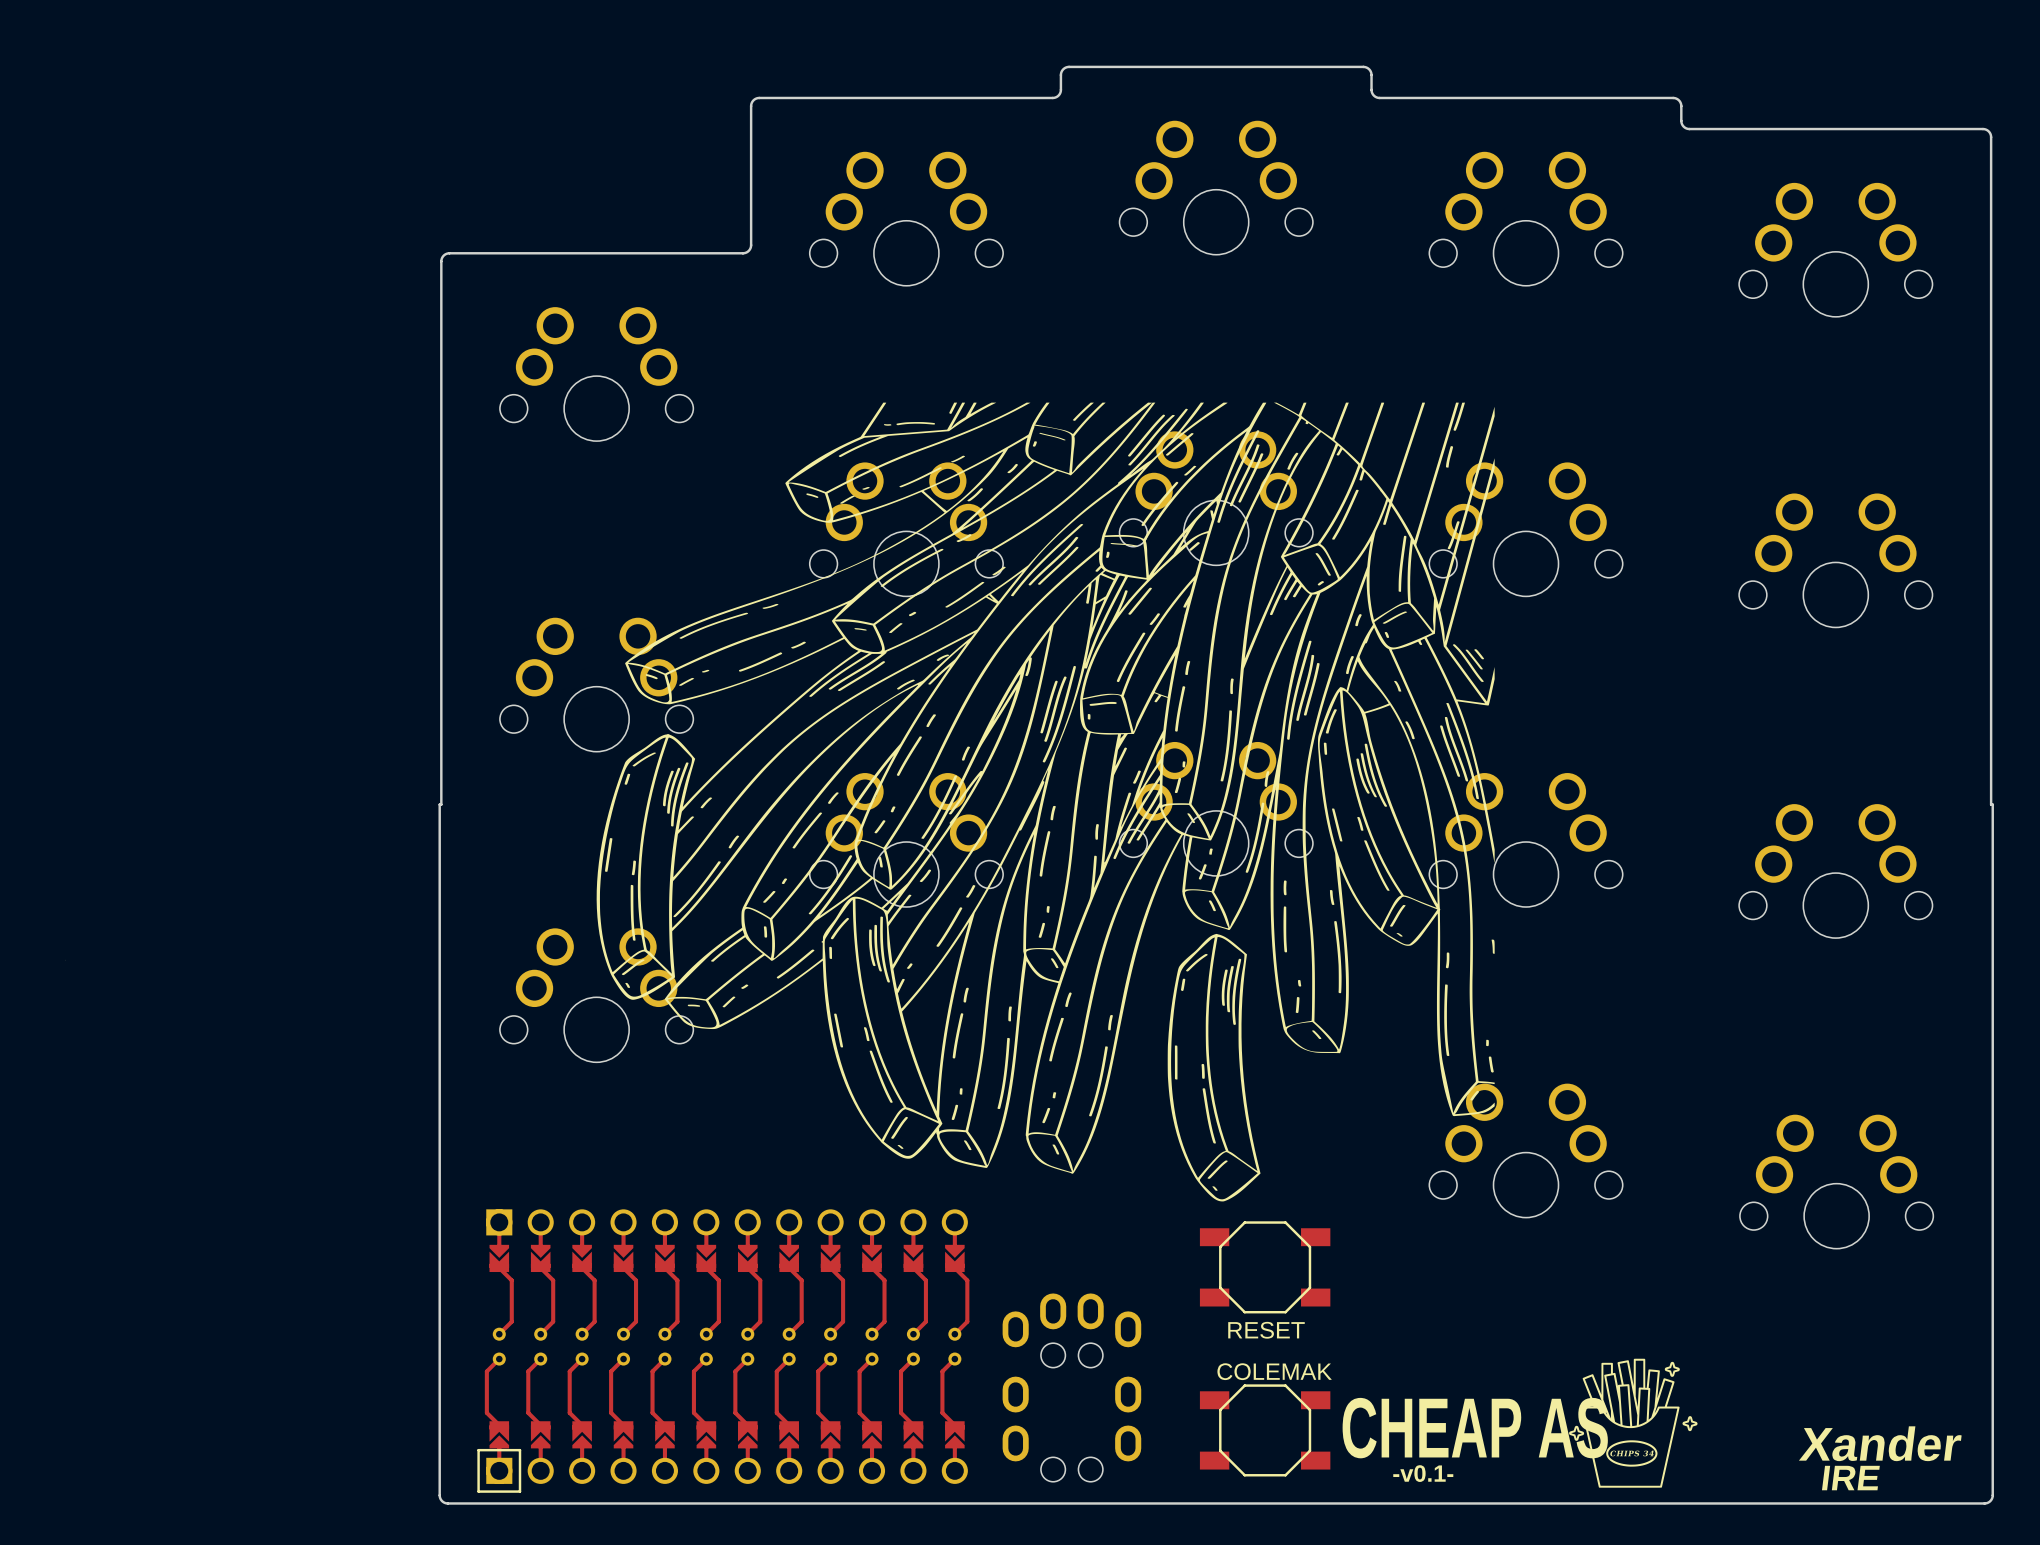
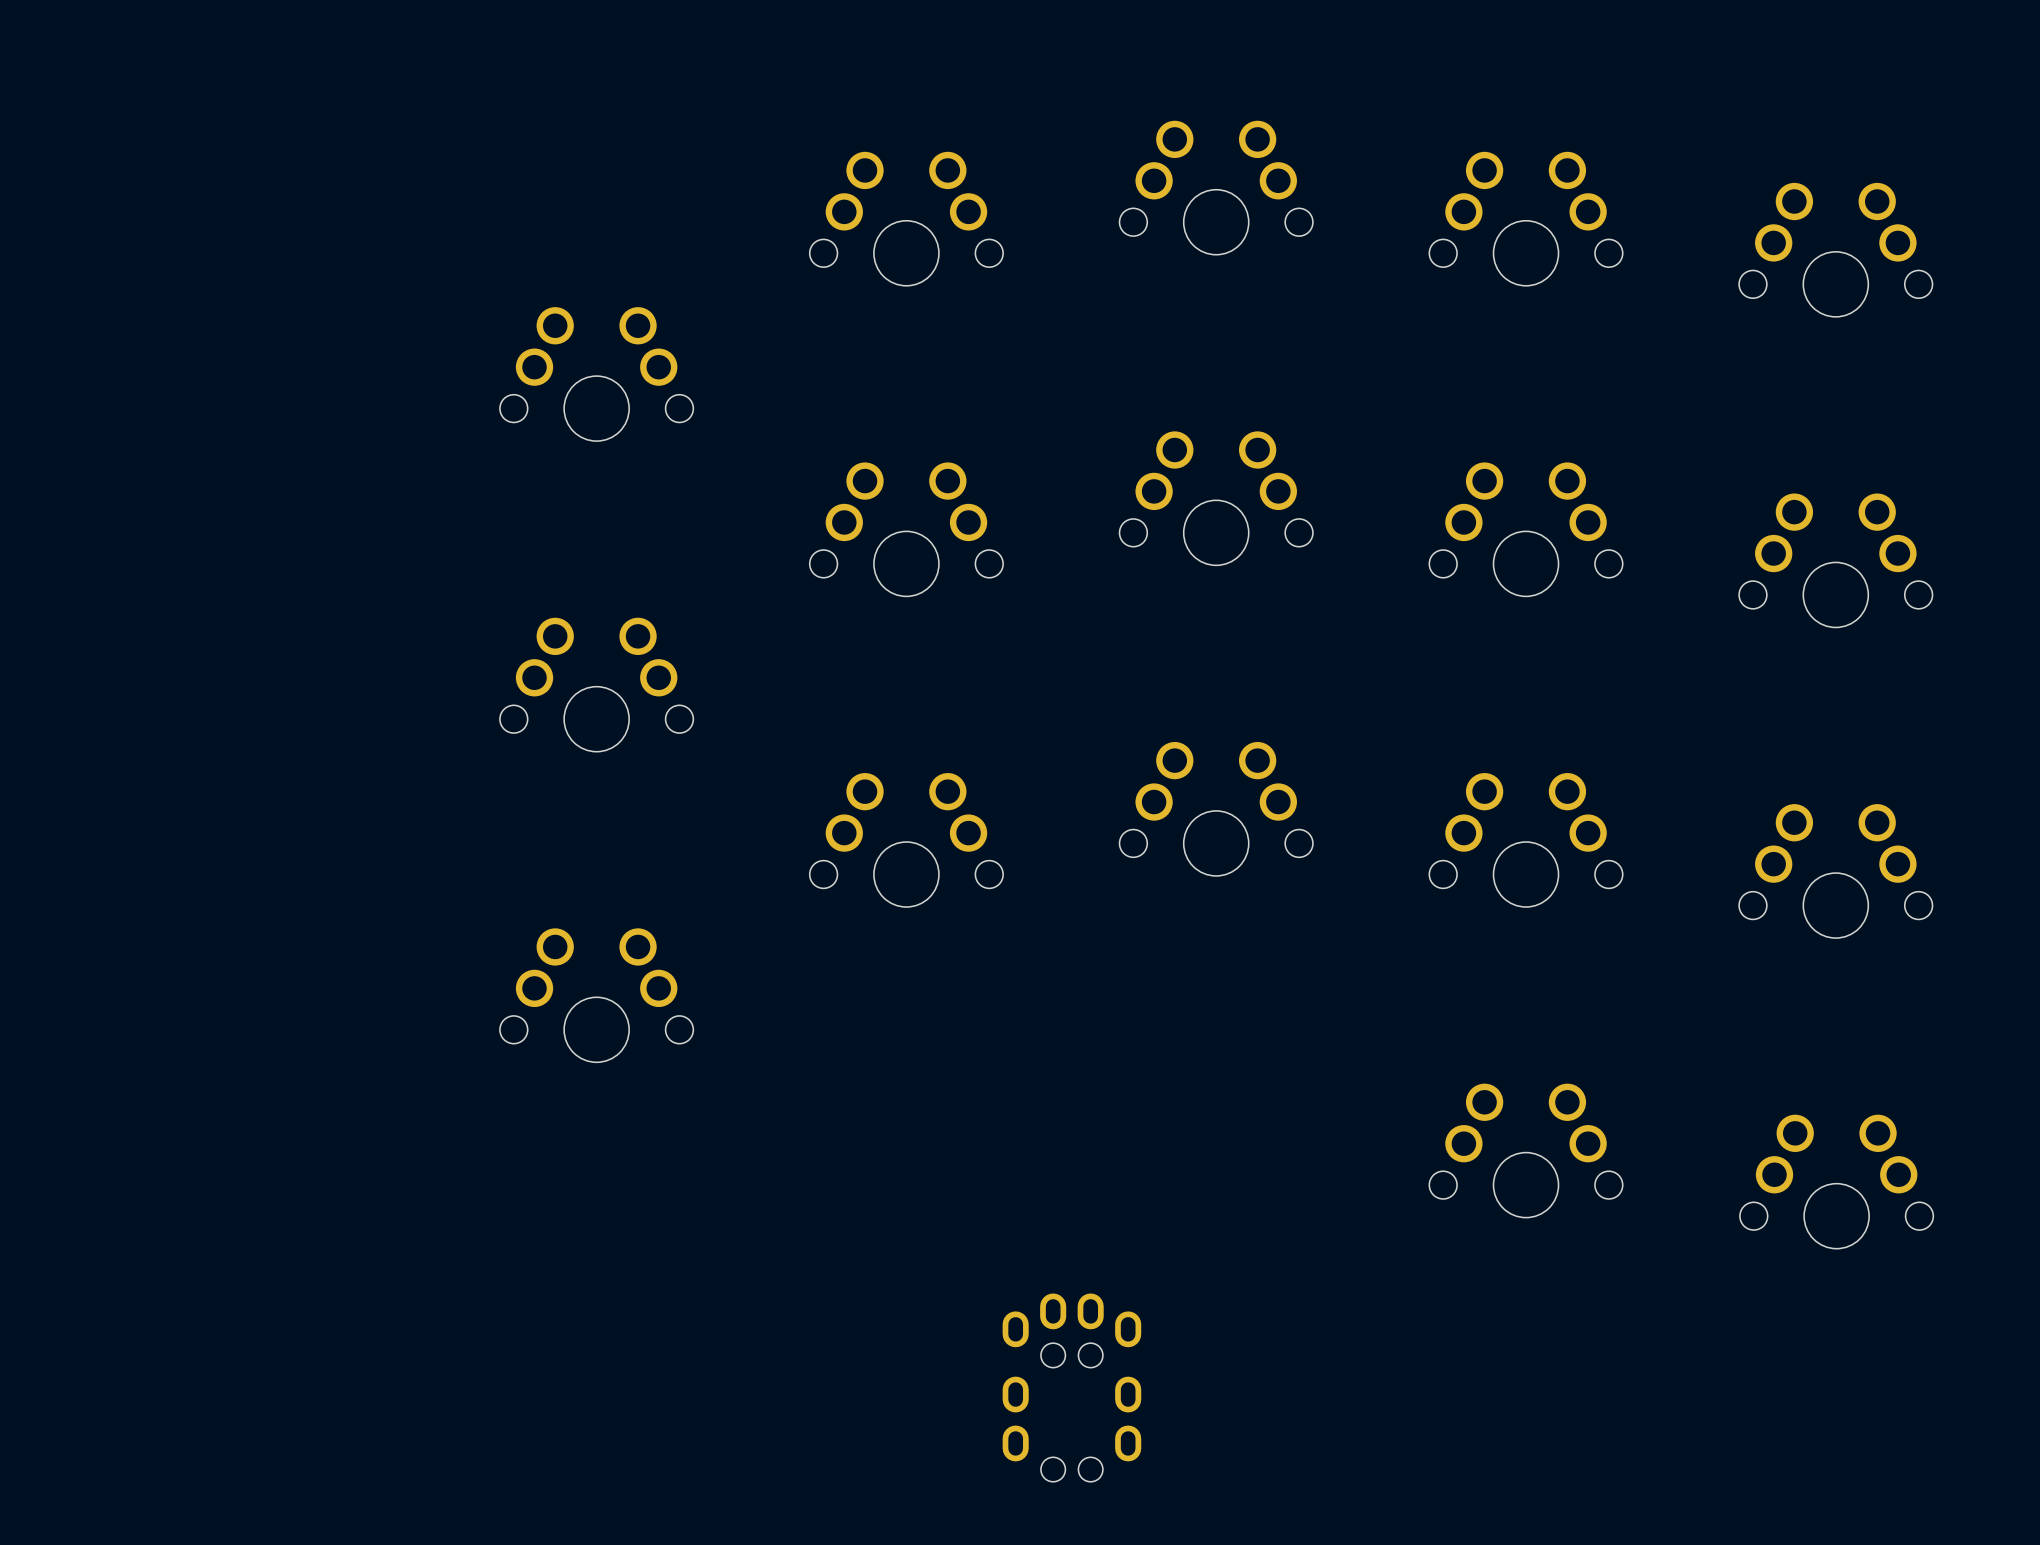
board edge: (1069, 66) (1364, 66) (1370, 71) (1371, 91) (1378, 97) (1673, 97) (1680, 103) (1681, 122) (1688, 128) (1982, 129) (1990, 133) (1992, 1495) (1988, 1502) (447, 1503) (440, 1499) (439, 804) (441, 804) (441, 258) (449, 253) (745, 253) (751, 246) (751, 106) (755, 99) (1053, 97) (1060, 91) (1061, 71) (1069, 66) -> none
drawing: [65, 402, 1495, 1202] -> none
part: (1265, 1267) -> none
text: RESET (1266, 1330) -> none
part: (723, 1351) -> none
drawing: [1569, 1358, 1698, 1488] -> none
text: COLEMAK (1274, 1371) -> none
text: CHEAP AS (1475, 1428) -> none
part: (1265, 1430) -> none
text: Xander (1880, 1443) -> none
text: -v0.1- (1423, 1473) -> none
text: IRE (1850, 1478) -> none

